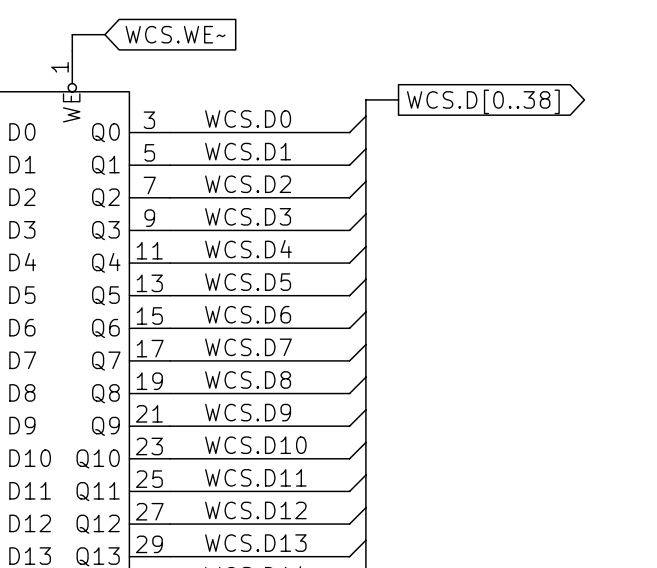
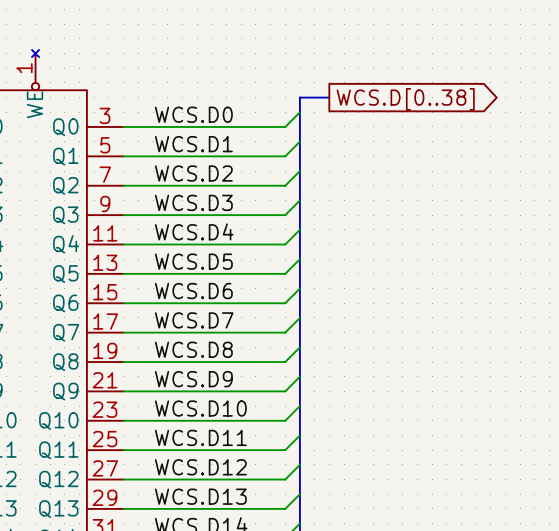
wire: (104, 34) (72, 34) (72, 51) -> none
global label: WCS.WE~ (175, 34) -> none
no-connect mark: none -> (35, 53)

